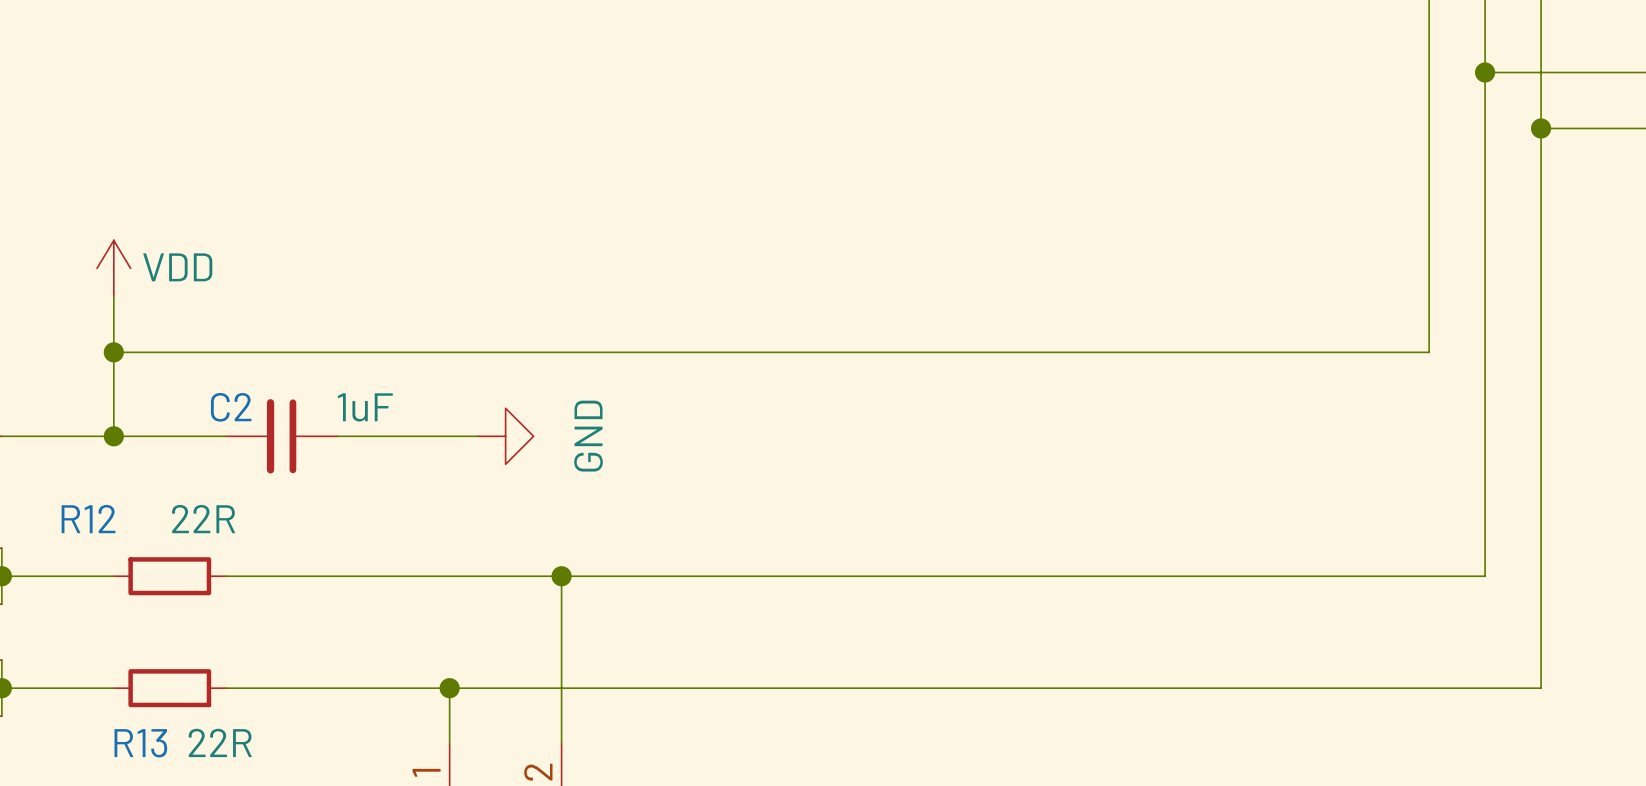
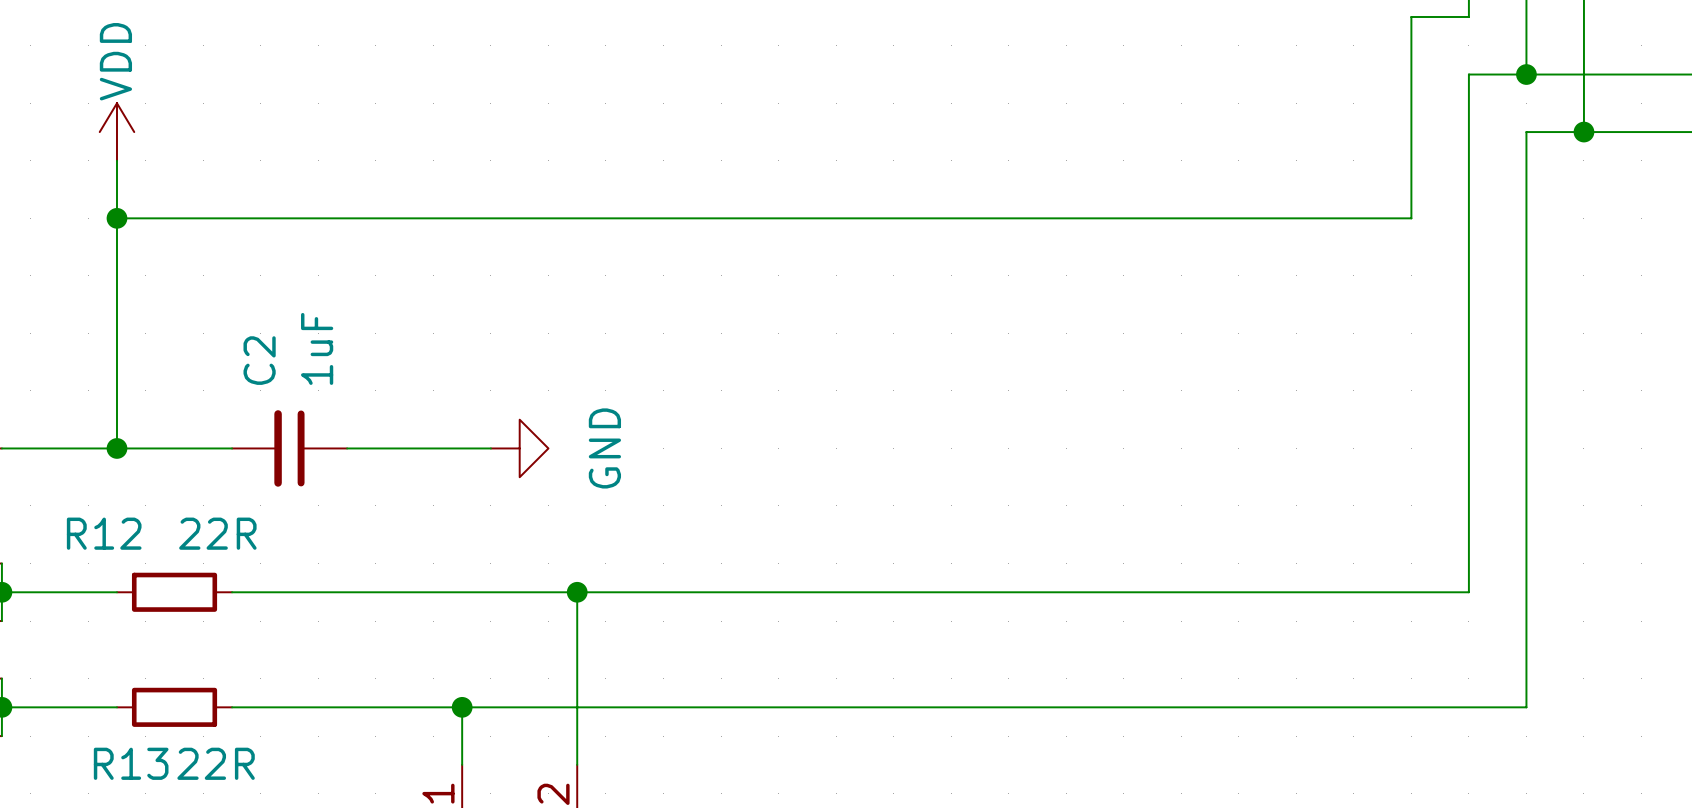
wire: (1429, 16) (1429, 72) -> (1526, 74) (1468, 74)
wire: none -> (1468, 16) (1411, 16) (1411, 218) (116, 218)
wire: (1485, 72) (1485, 128) -> (1583, 132) (1526, 132)
wire: (1541, 128) (1541, 688) (1485, 688) -> none
wire: none -> (116, 160) (116, 304)
junction: none -> (116, 218)
power symbol text rotation: 0° (177, 267) -> 90° counterclockwise (115, 61)
power symbol position: VDD (113, 268) -> VDD (116, 132)
wire: (113, 352) (1429, 352) -> (1468, 592) (1468, 362)
junction: (113, 352) -> none
C2 name rotation: 0° (231, 407) -> 90° counterclockwise (259, 360)
C2 name position: C2 (231, 407) -> C2 (259, 360)
C2 value rotation: 0° (365, 407) -> 90° counterclockwise (317, 348)
wire: (1429, 576) (1485, 576) -> (1526, 707) (1526, 592)

